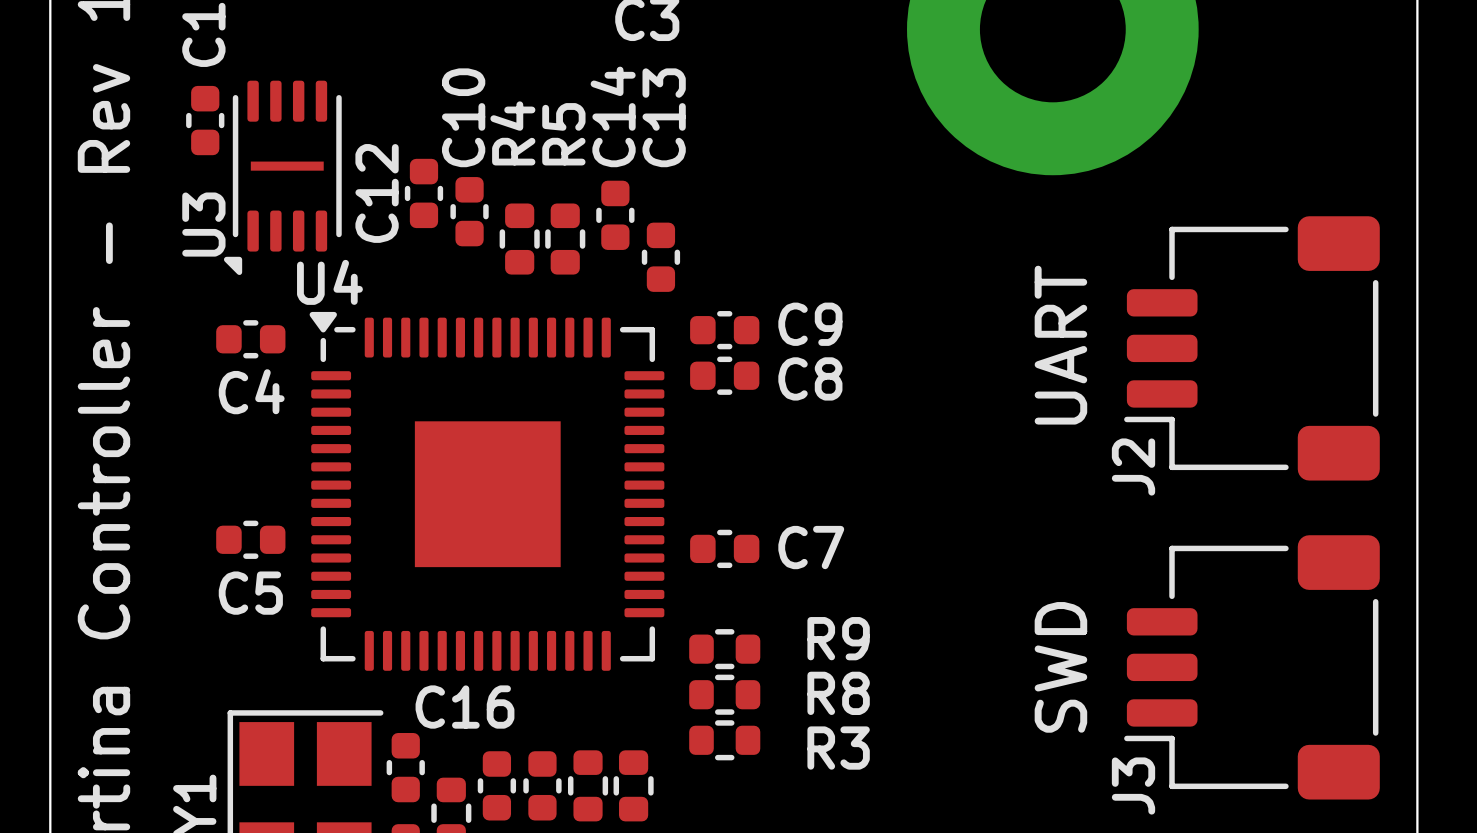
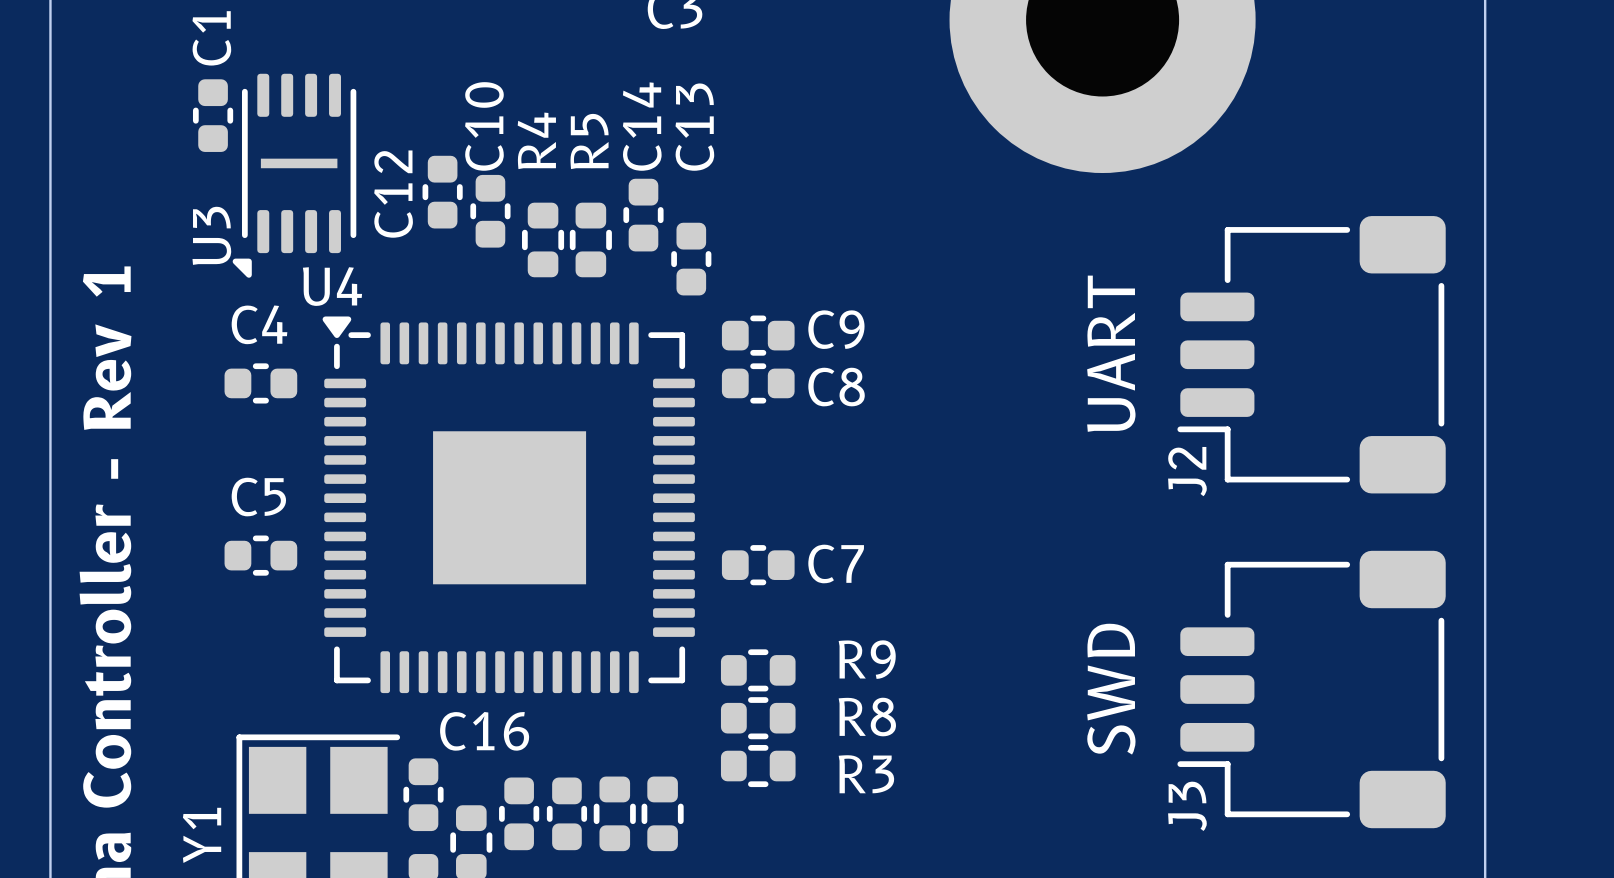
C4 position: (250, 339) -> (260, 383)
C4 name position: C4 (251, 391) -> C4 (259, 324)
C5 name position: C5 (250, 593) -> C5 (258, 497)

